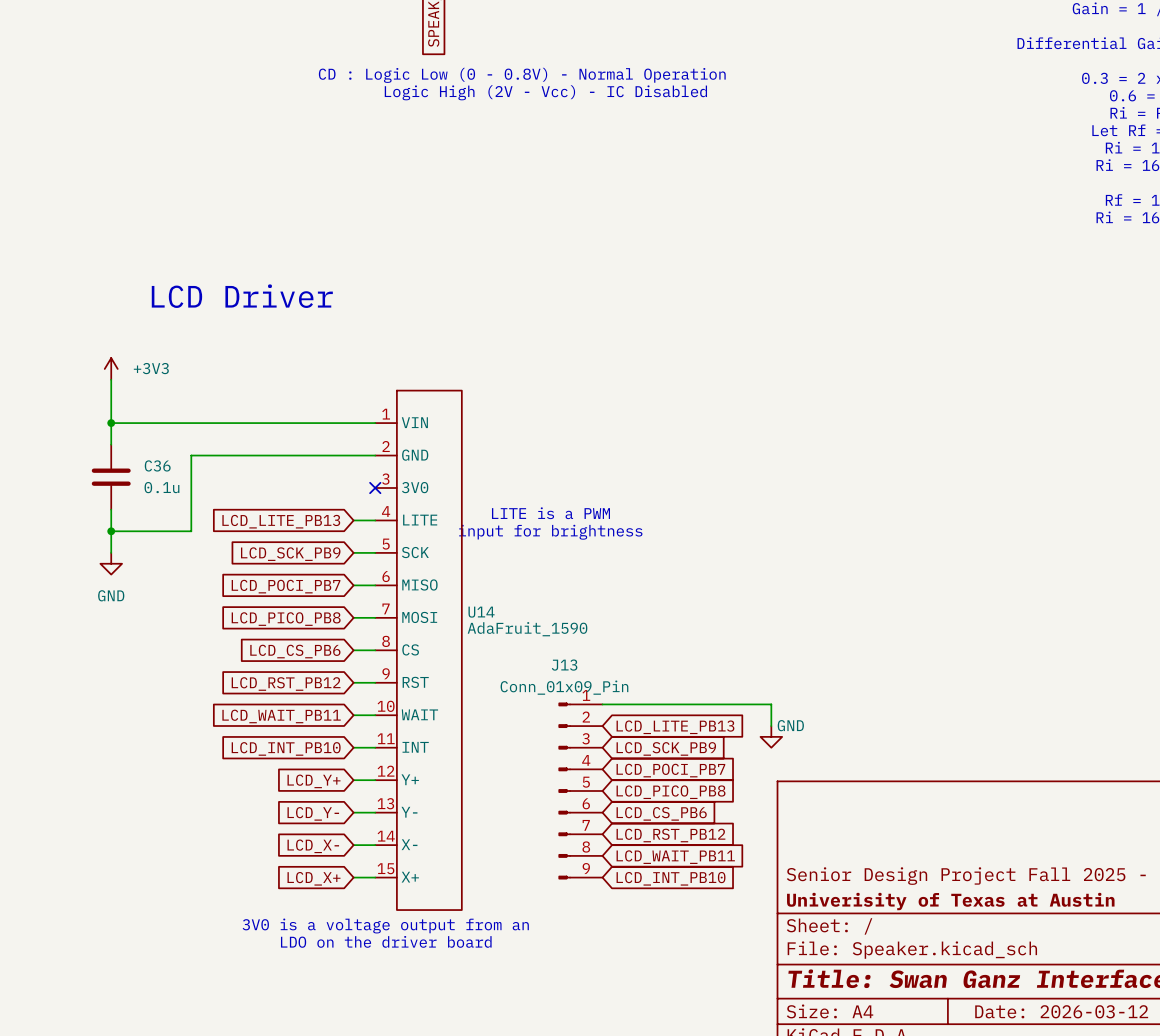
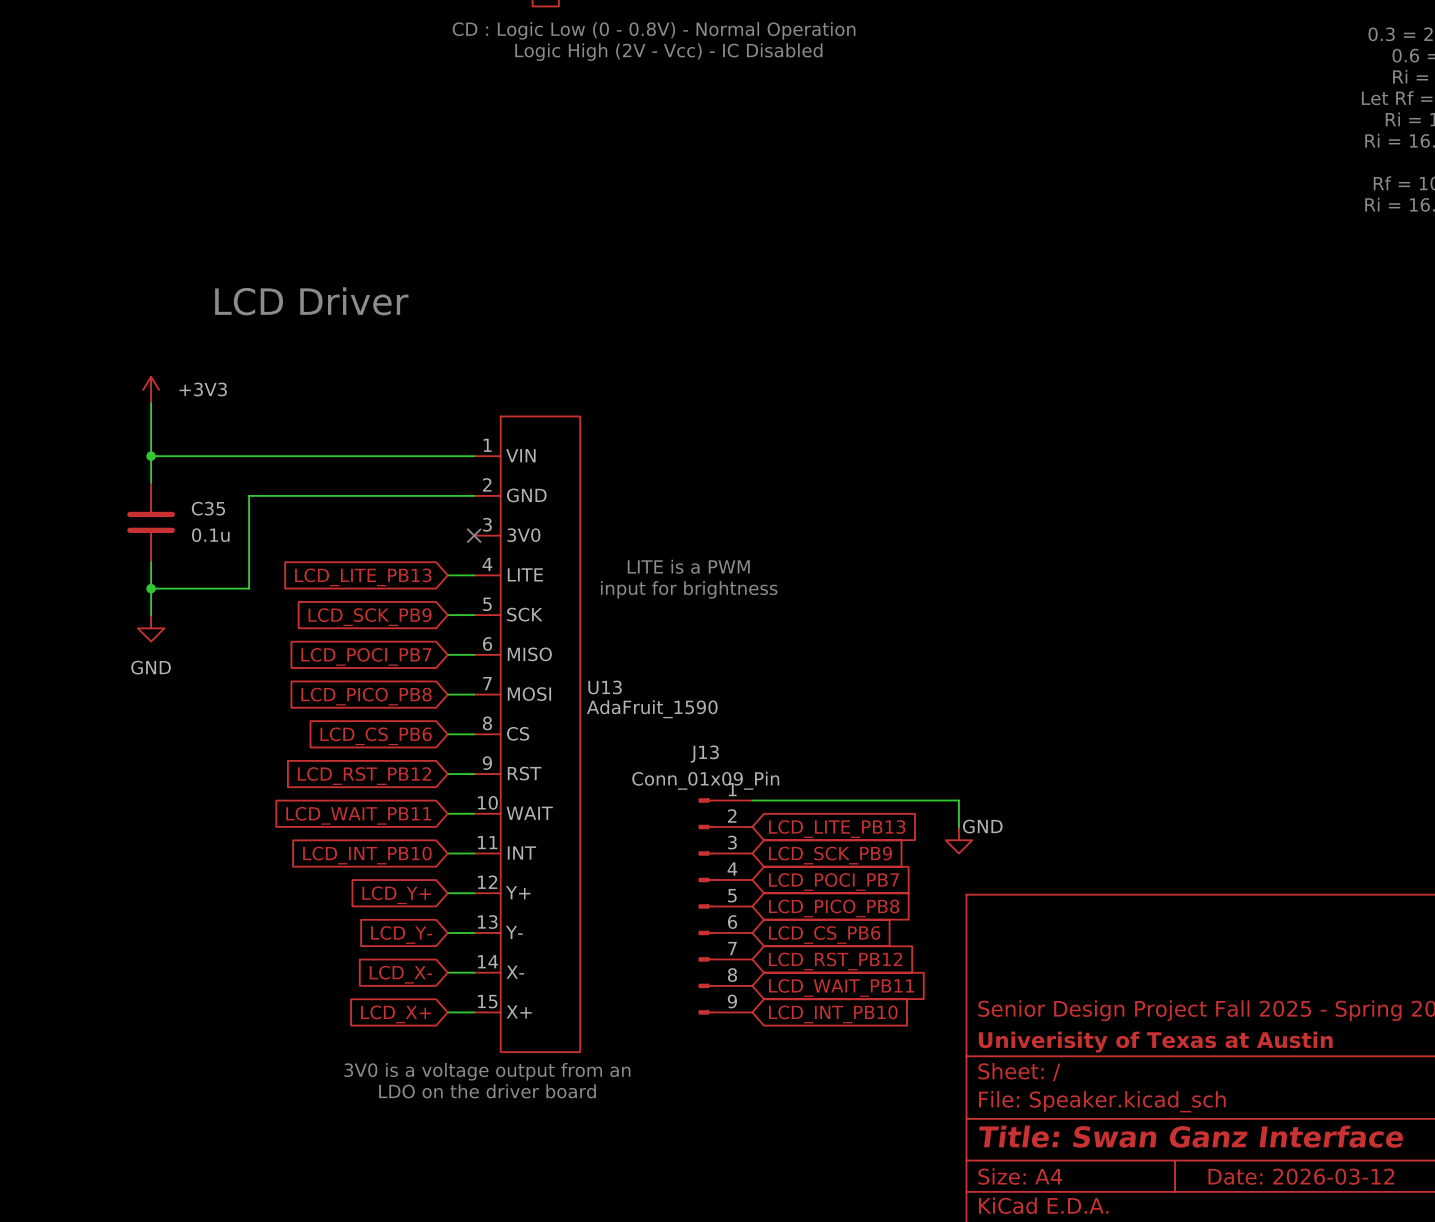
C36 name: C36 (157, 465) -> C35 (208, 508)
U14 name: U14 (481, 612) -> U13 (605, 687)

